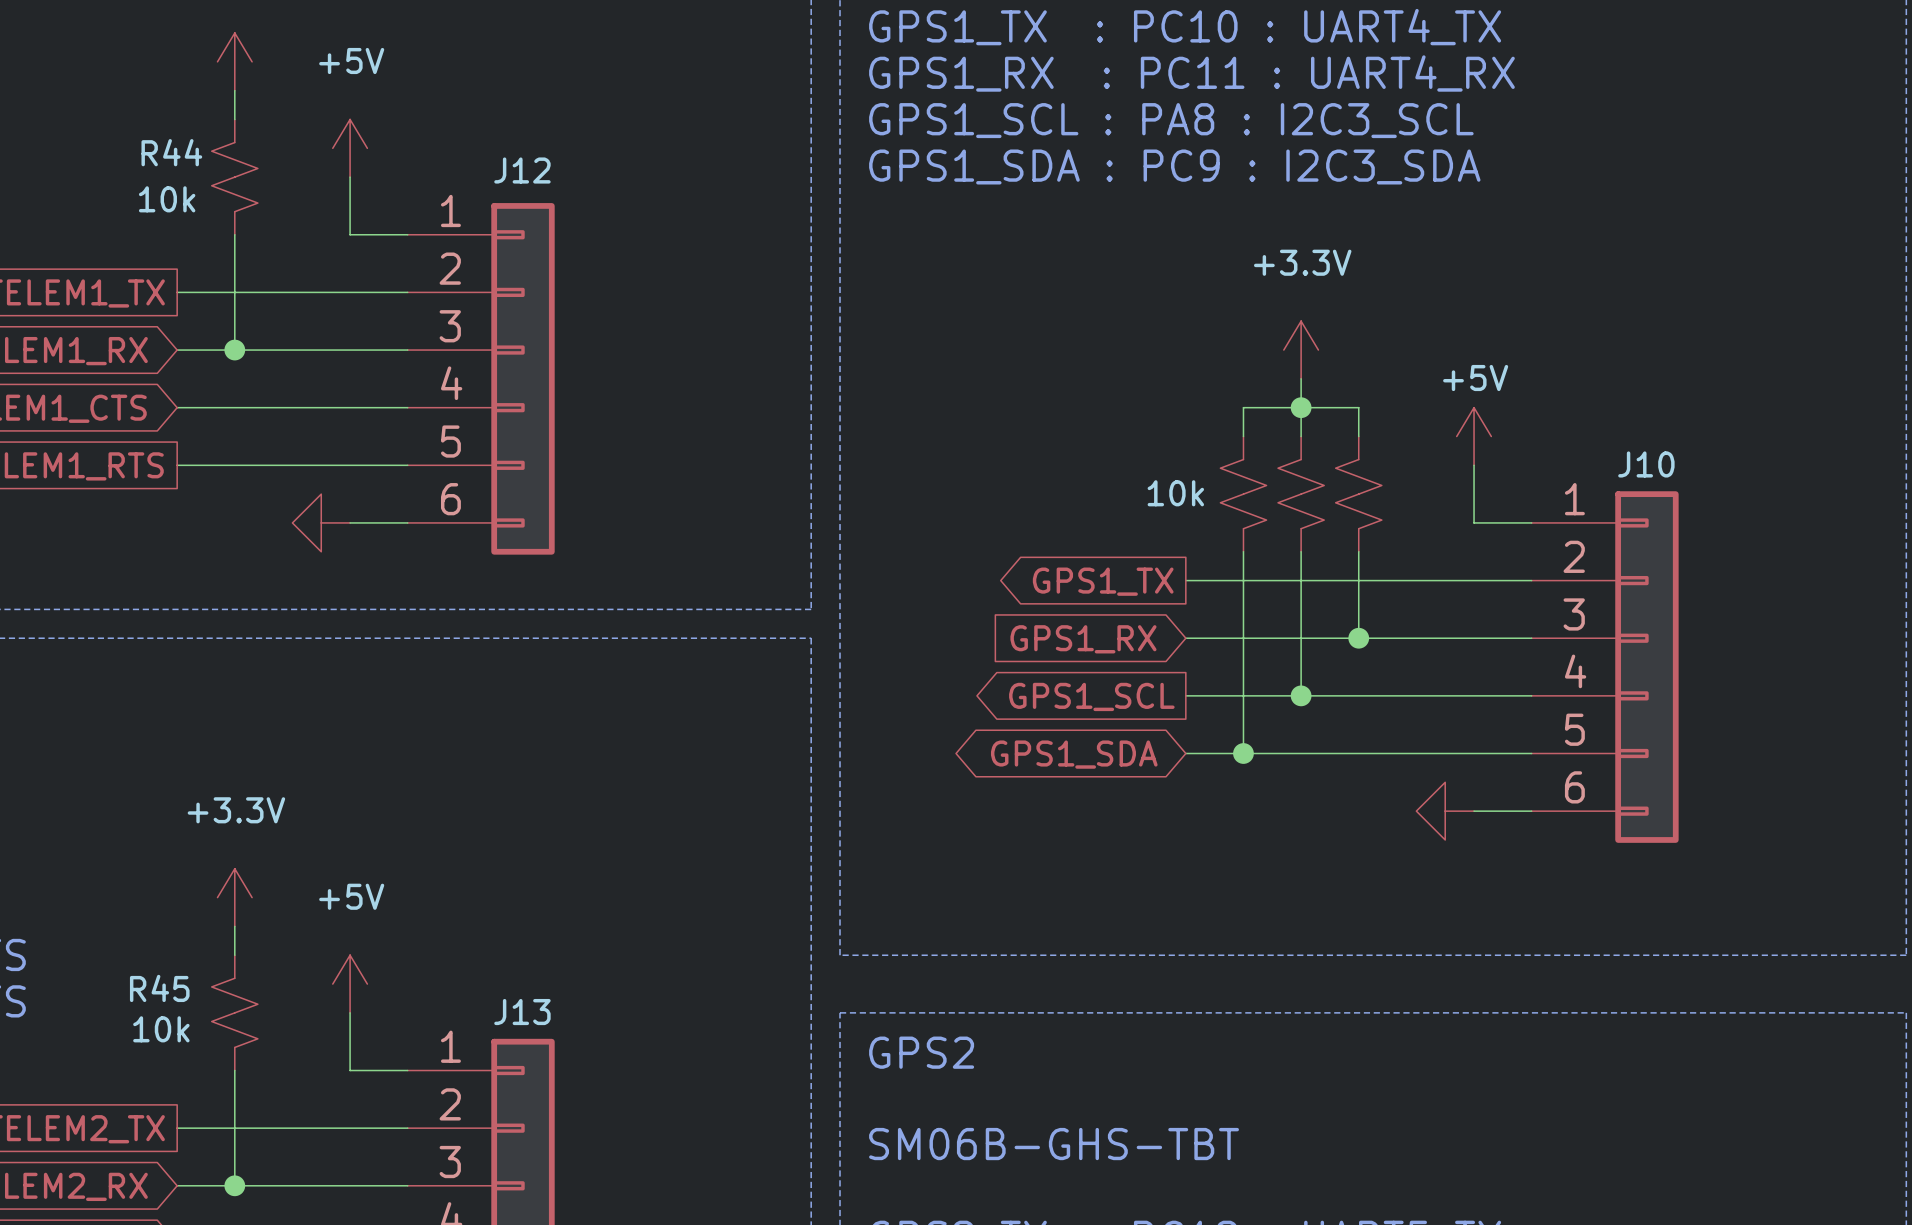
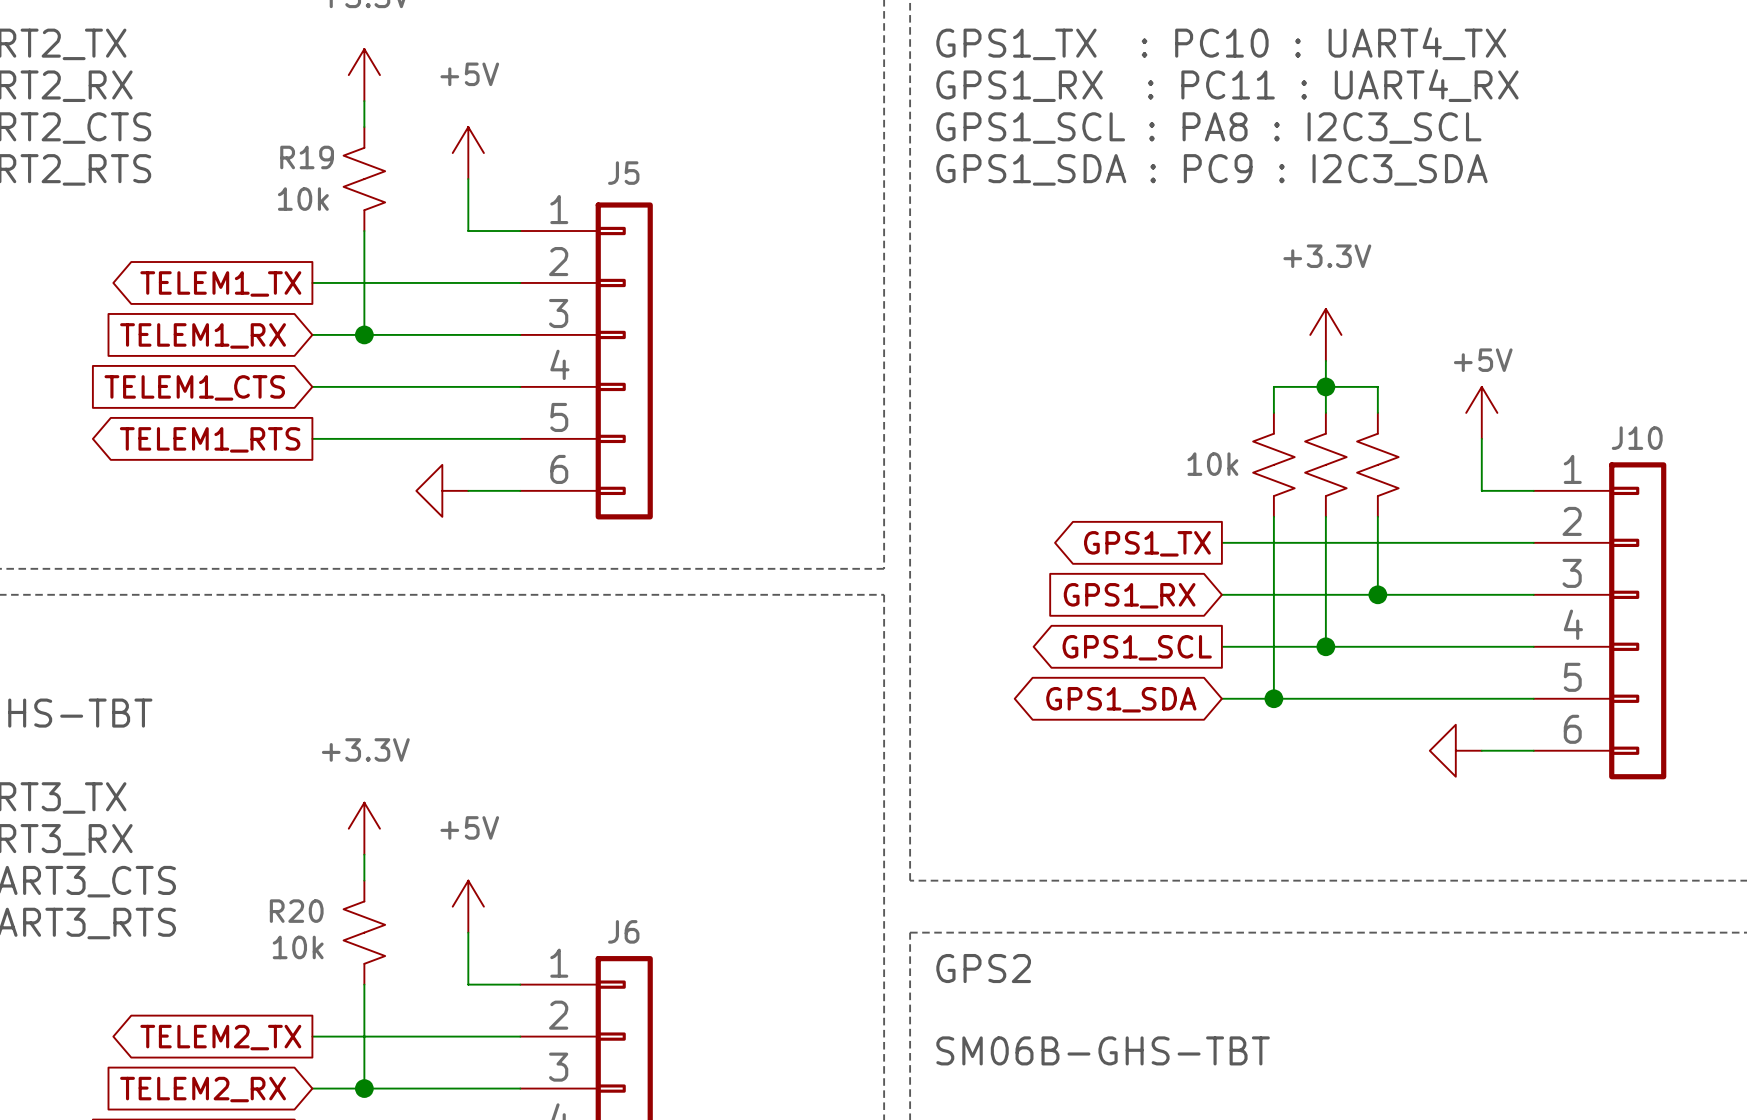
R44 name: R44 (171, 152) -> R19 (307, 157)
J12 name: J12 (522, 170) -> J5 (623, 173)
R45 name: R45 (159, 988) -> R20 (296, 911)
J13 name: J13 (522, 1012) -> J6 (623, 931)

